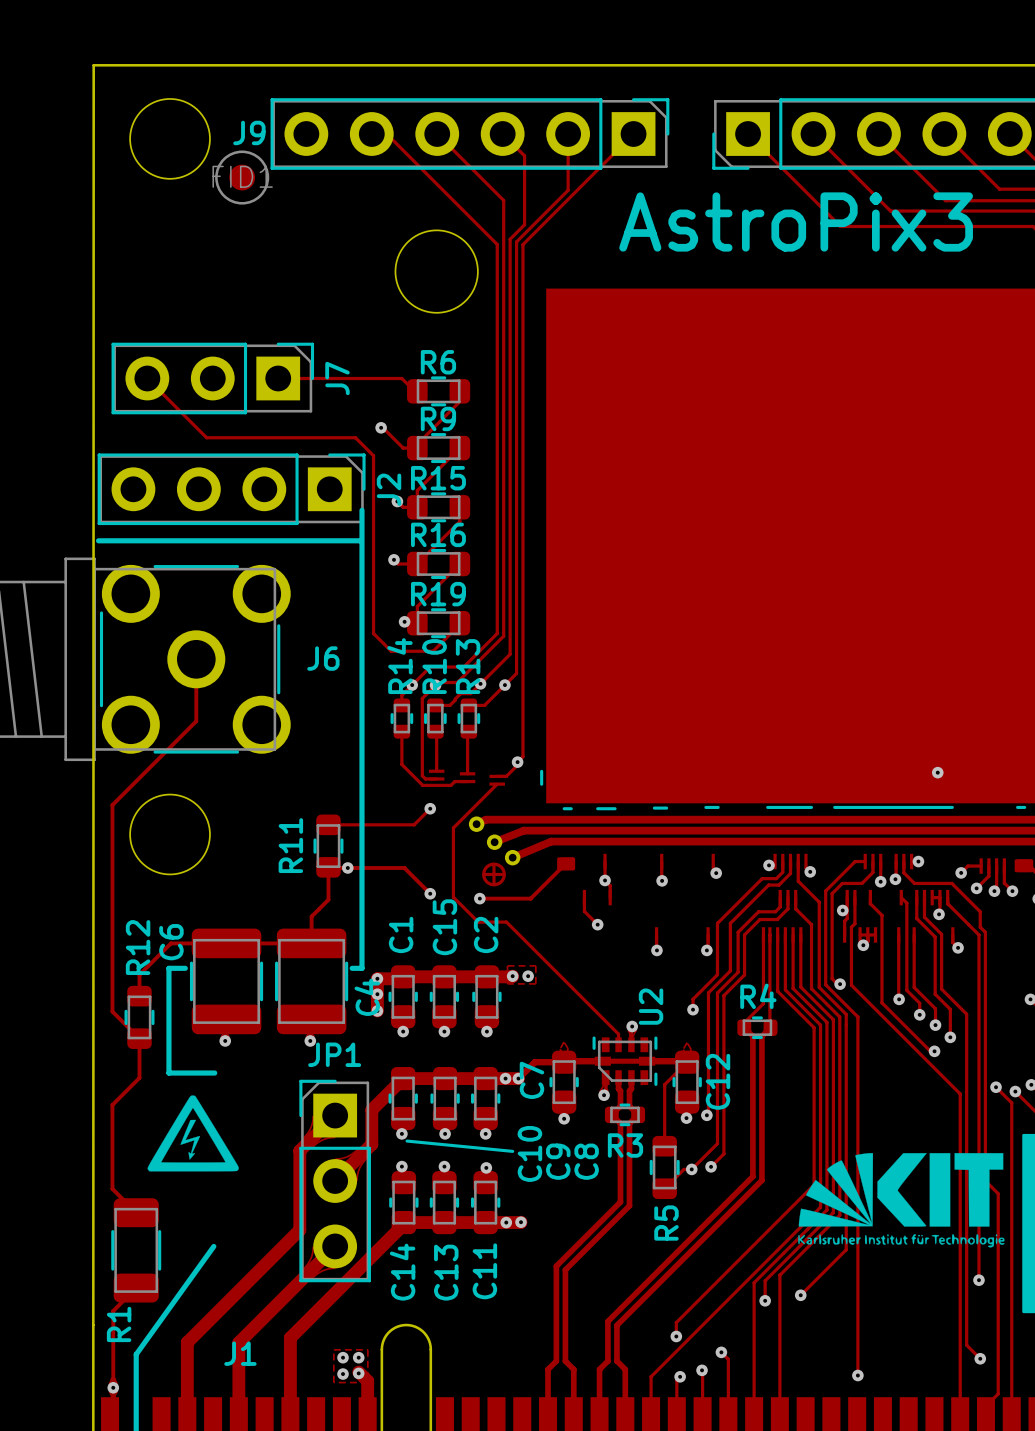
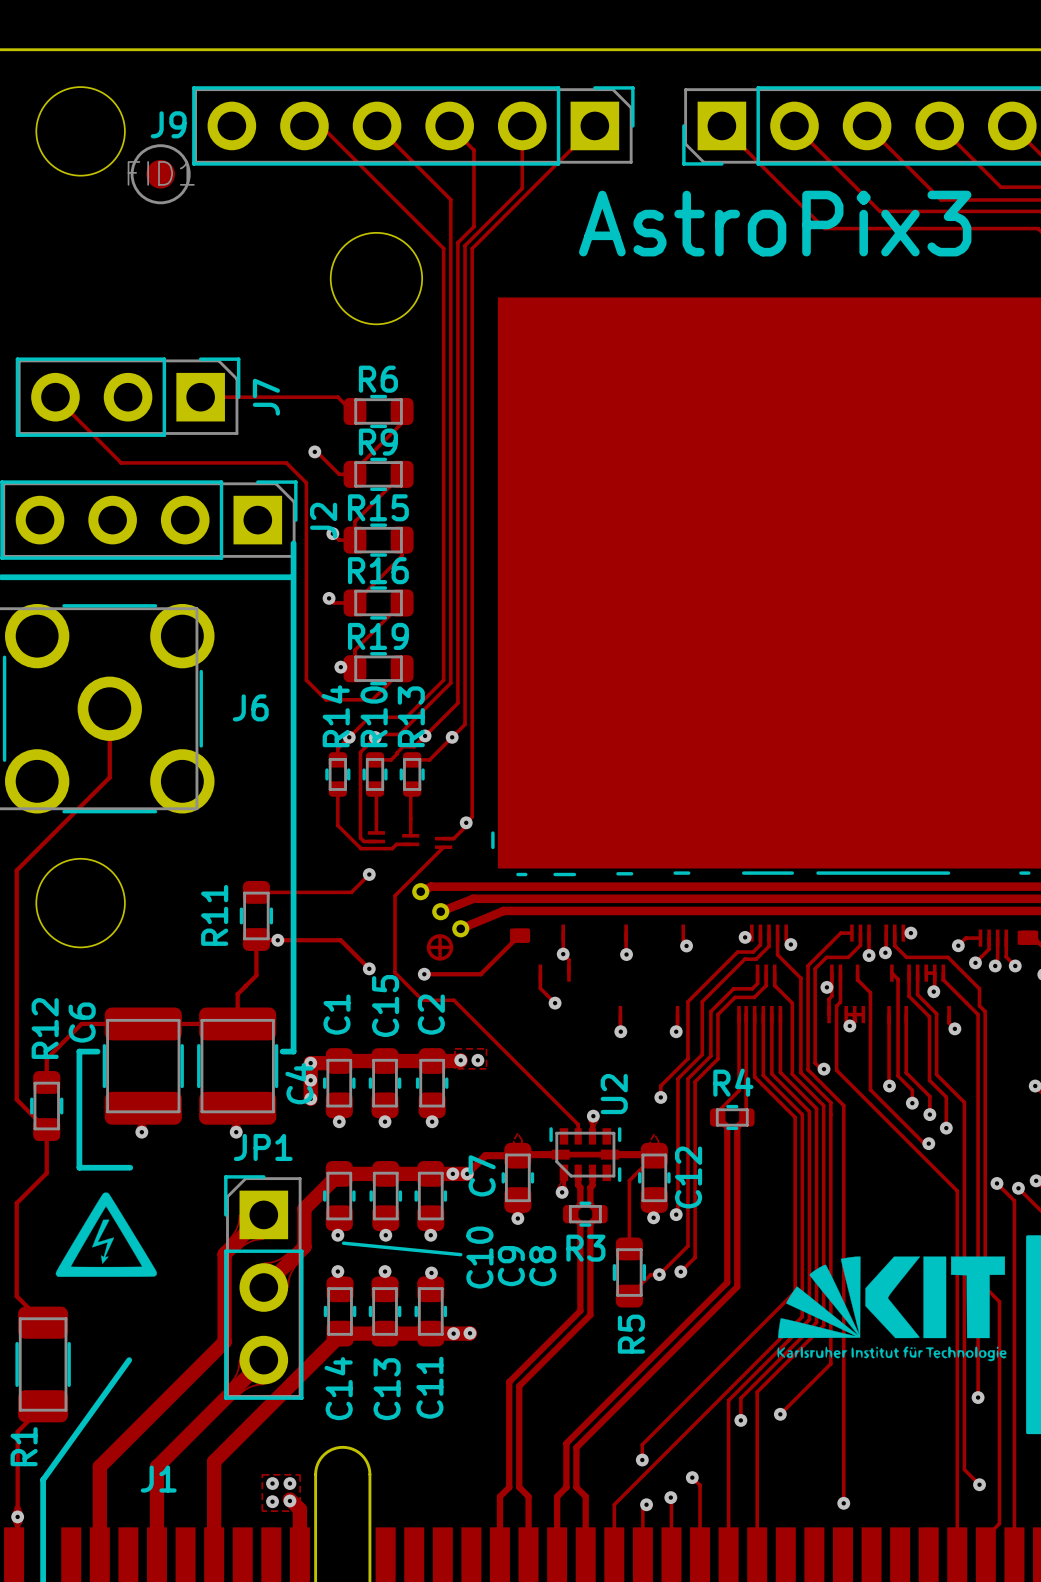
via: (937, 772) -> none

